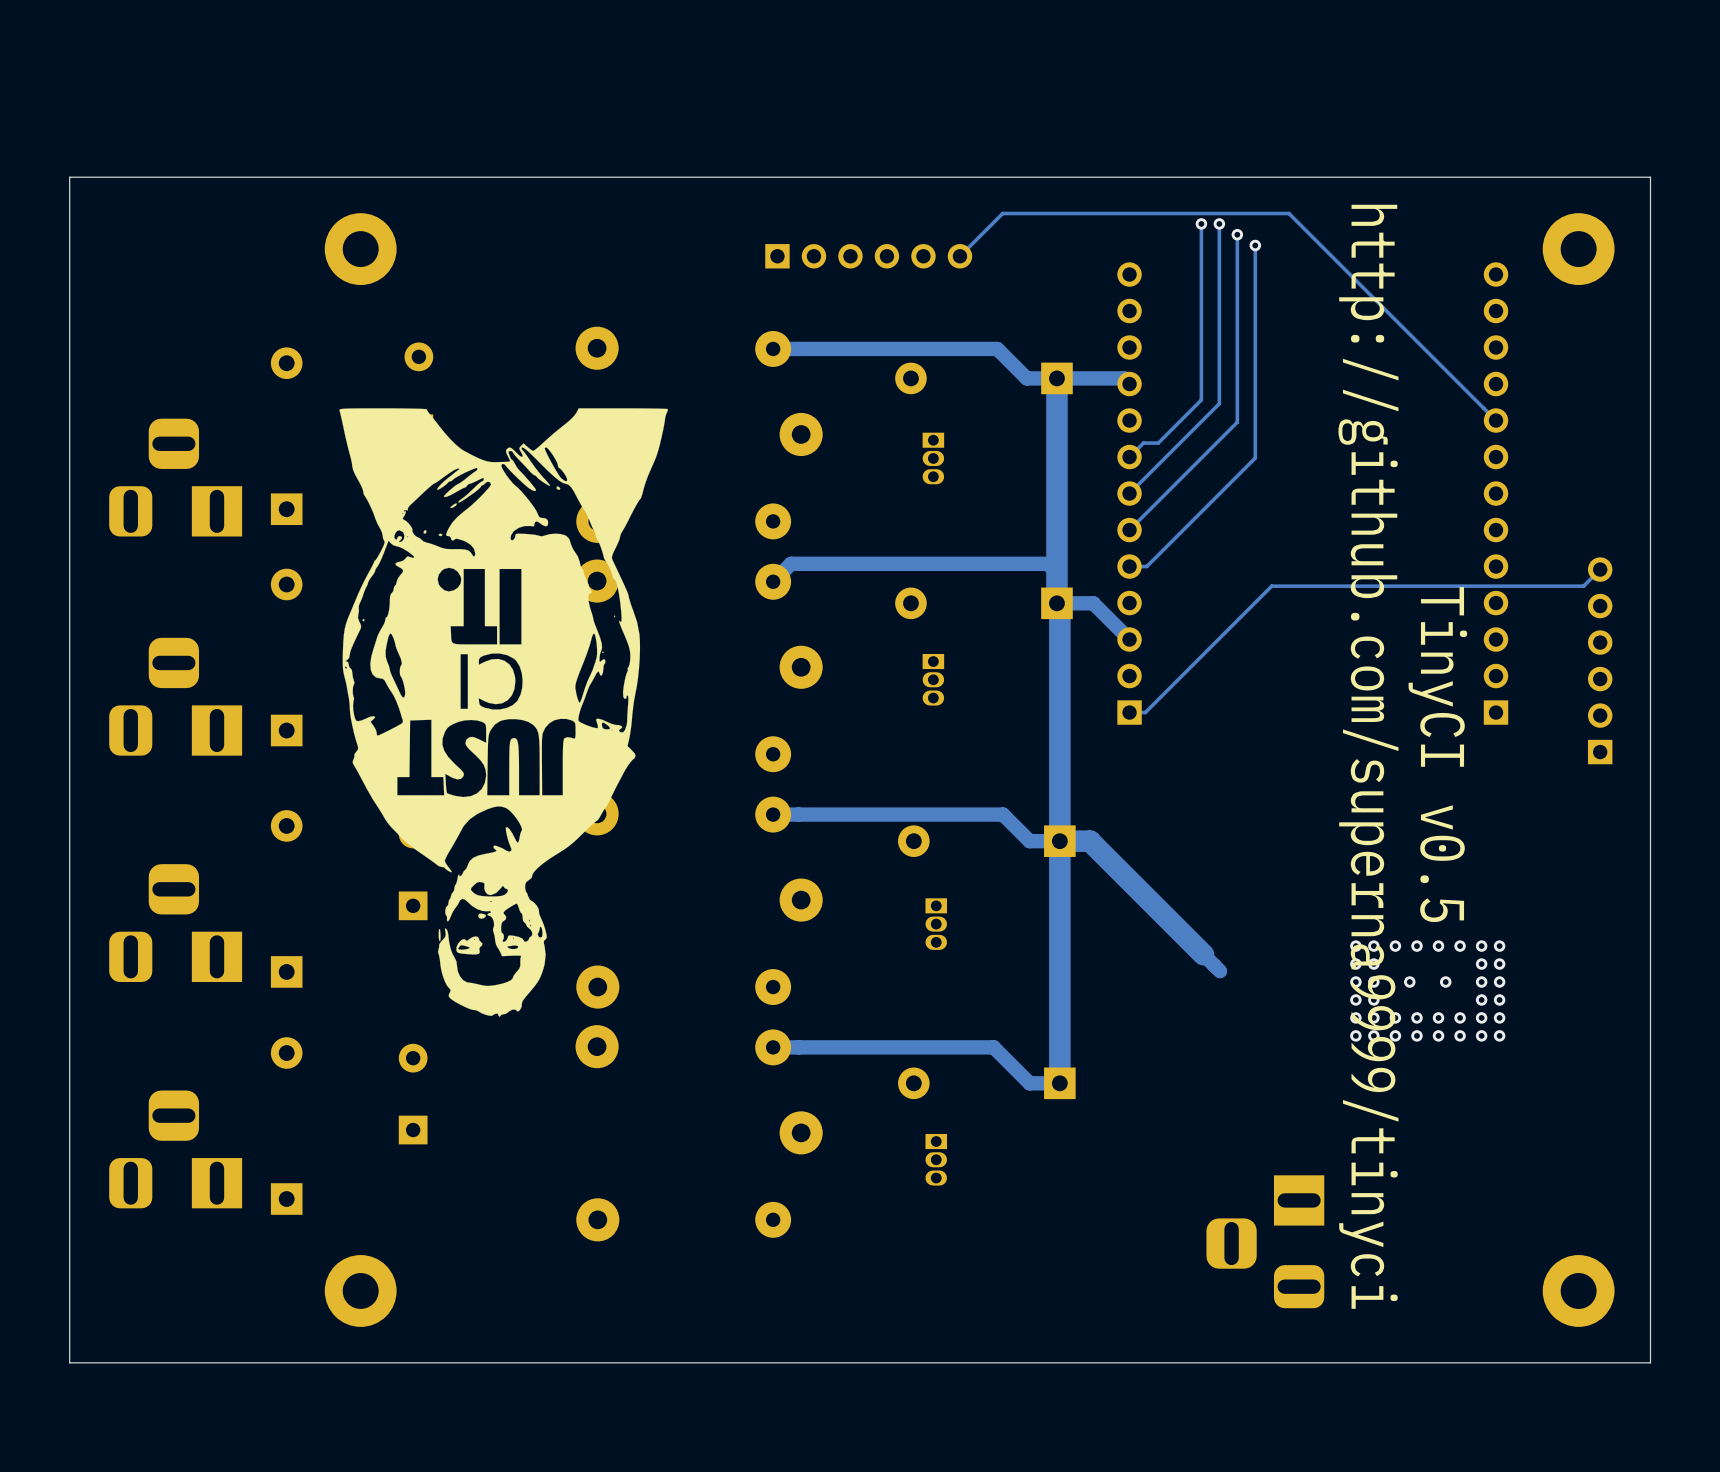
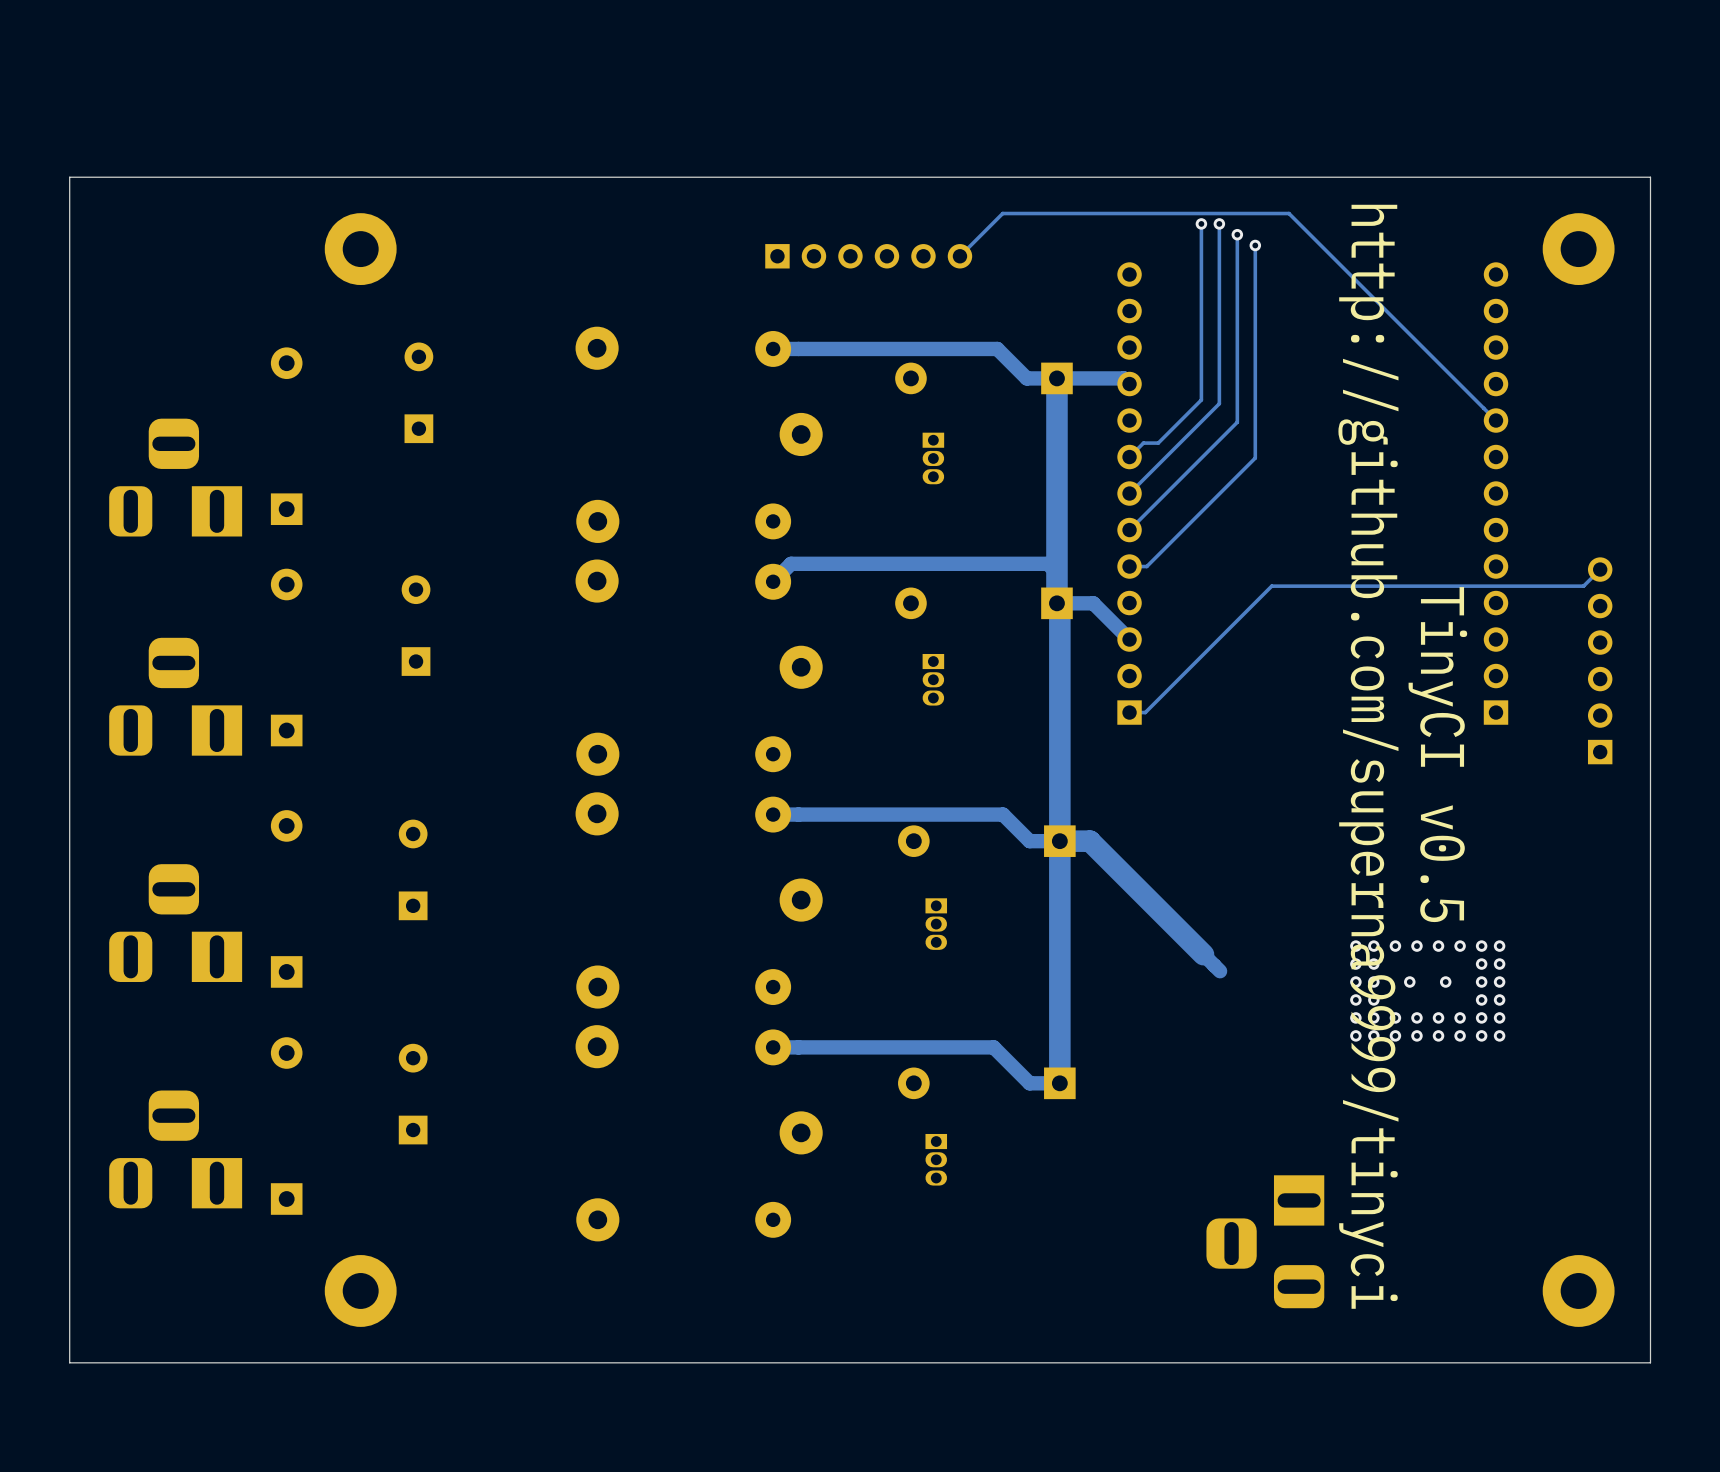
drawing: [339, 408, 668, 1017] -> none

